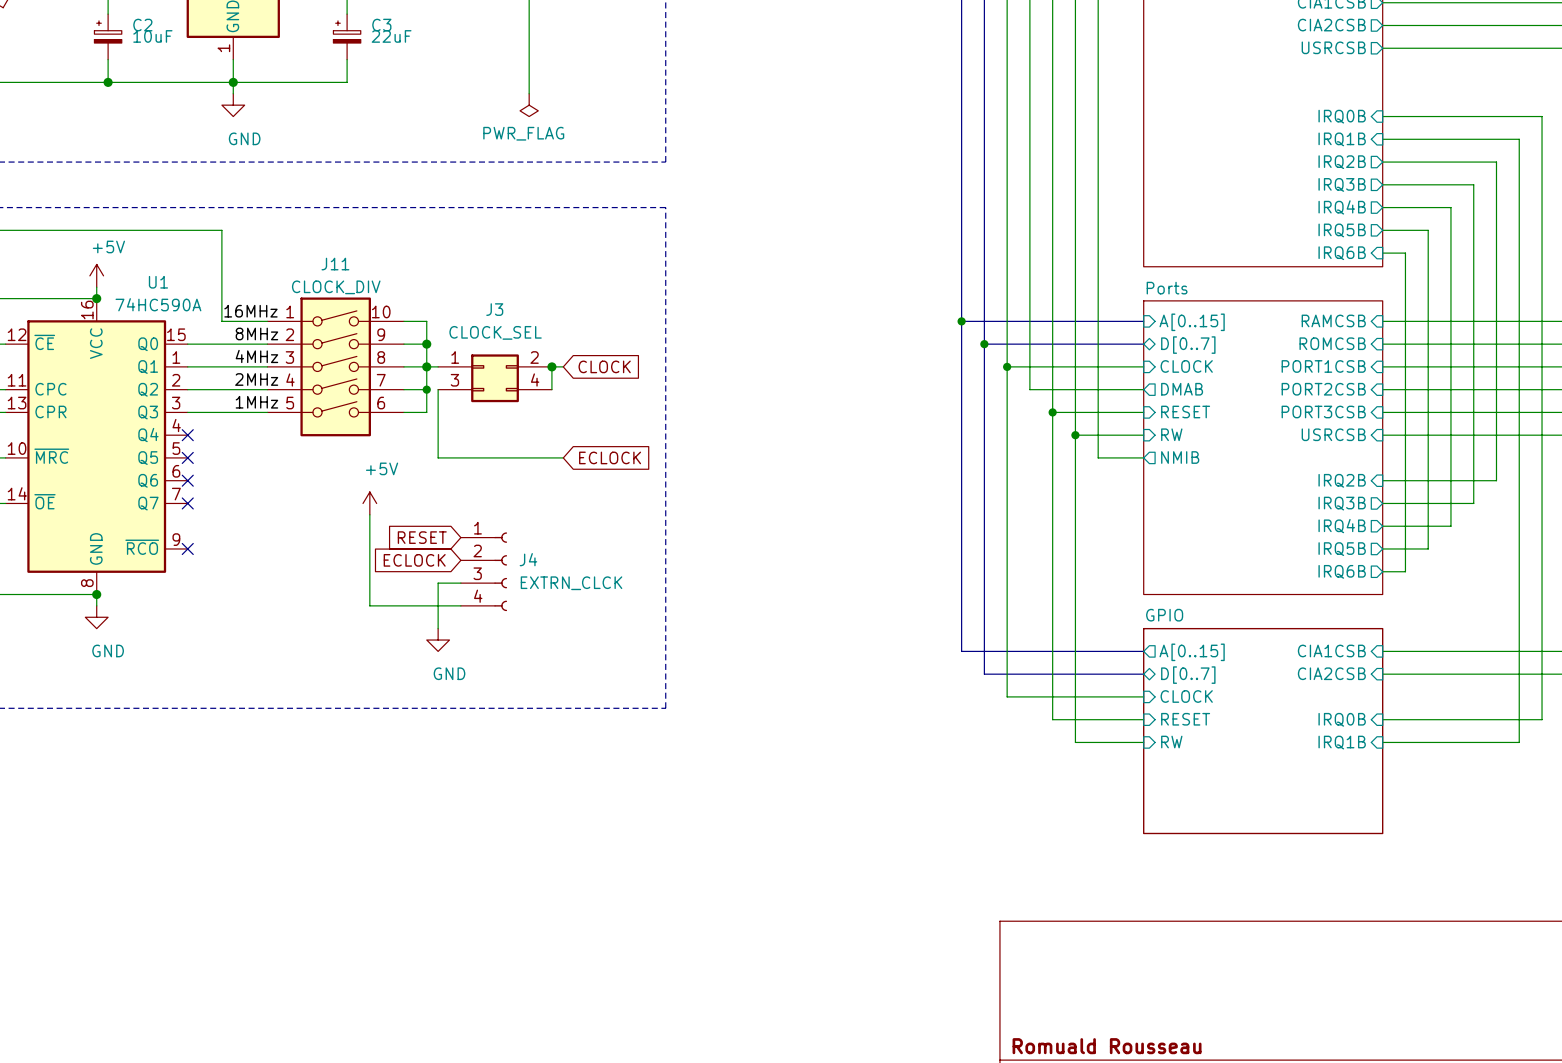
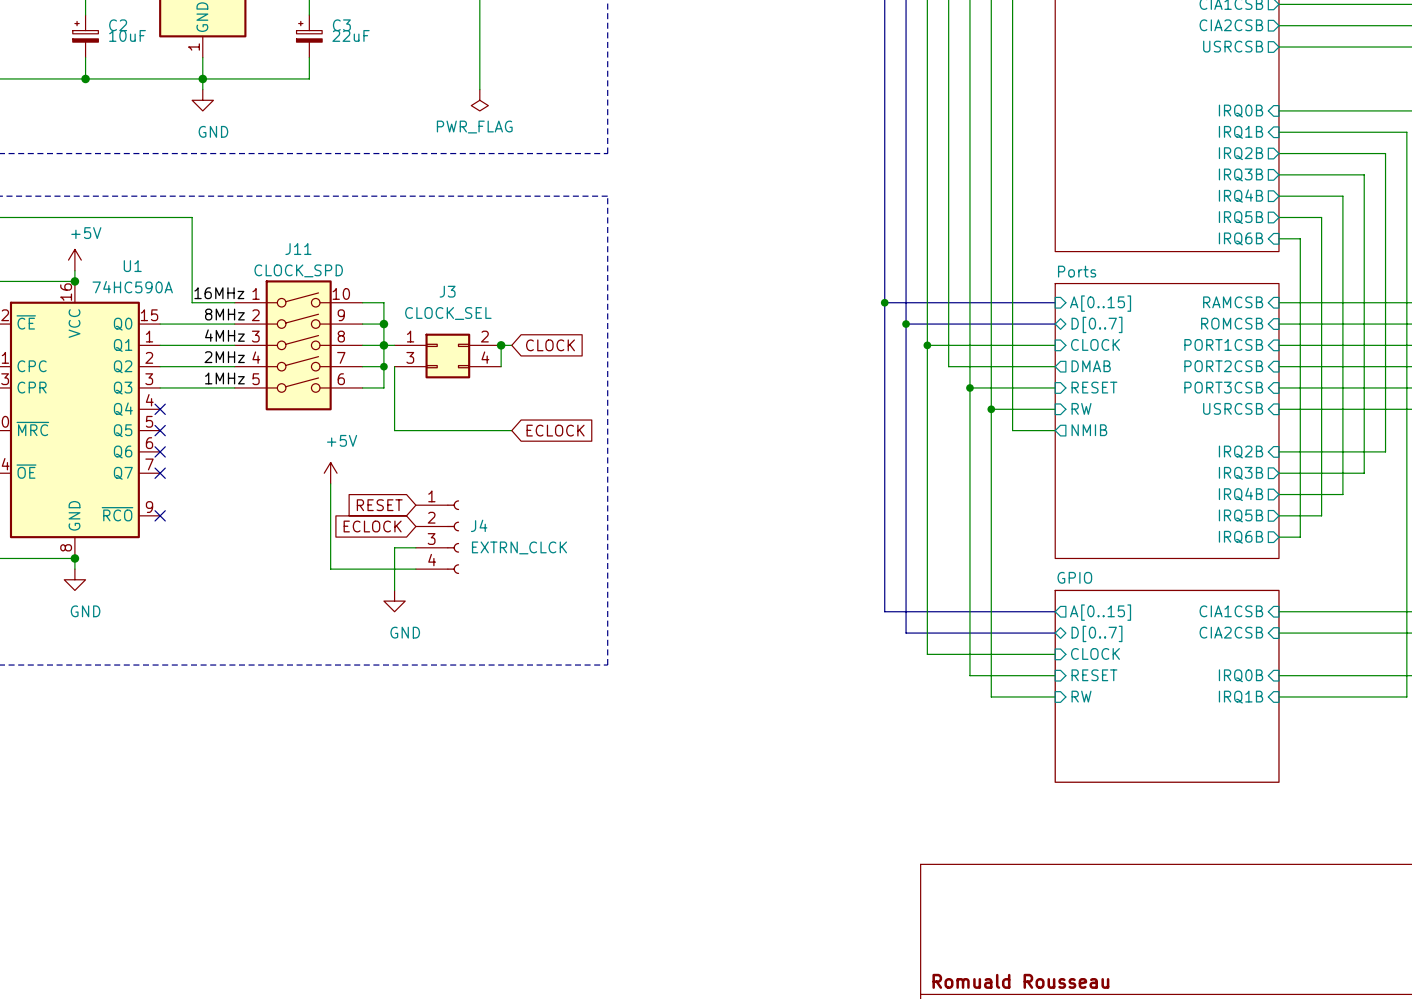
J11 value: CLOCK_DIV (336, 287) -> CLOCK_SPD (298, 270)

